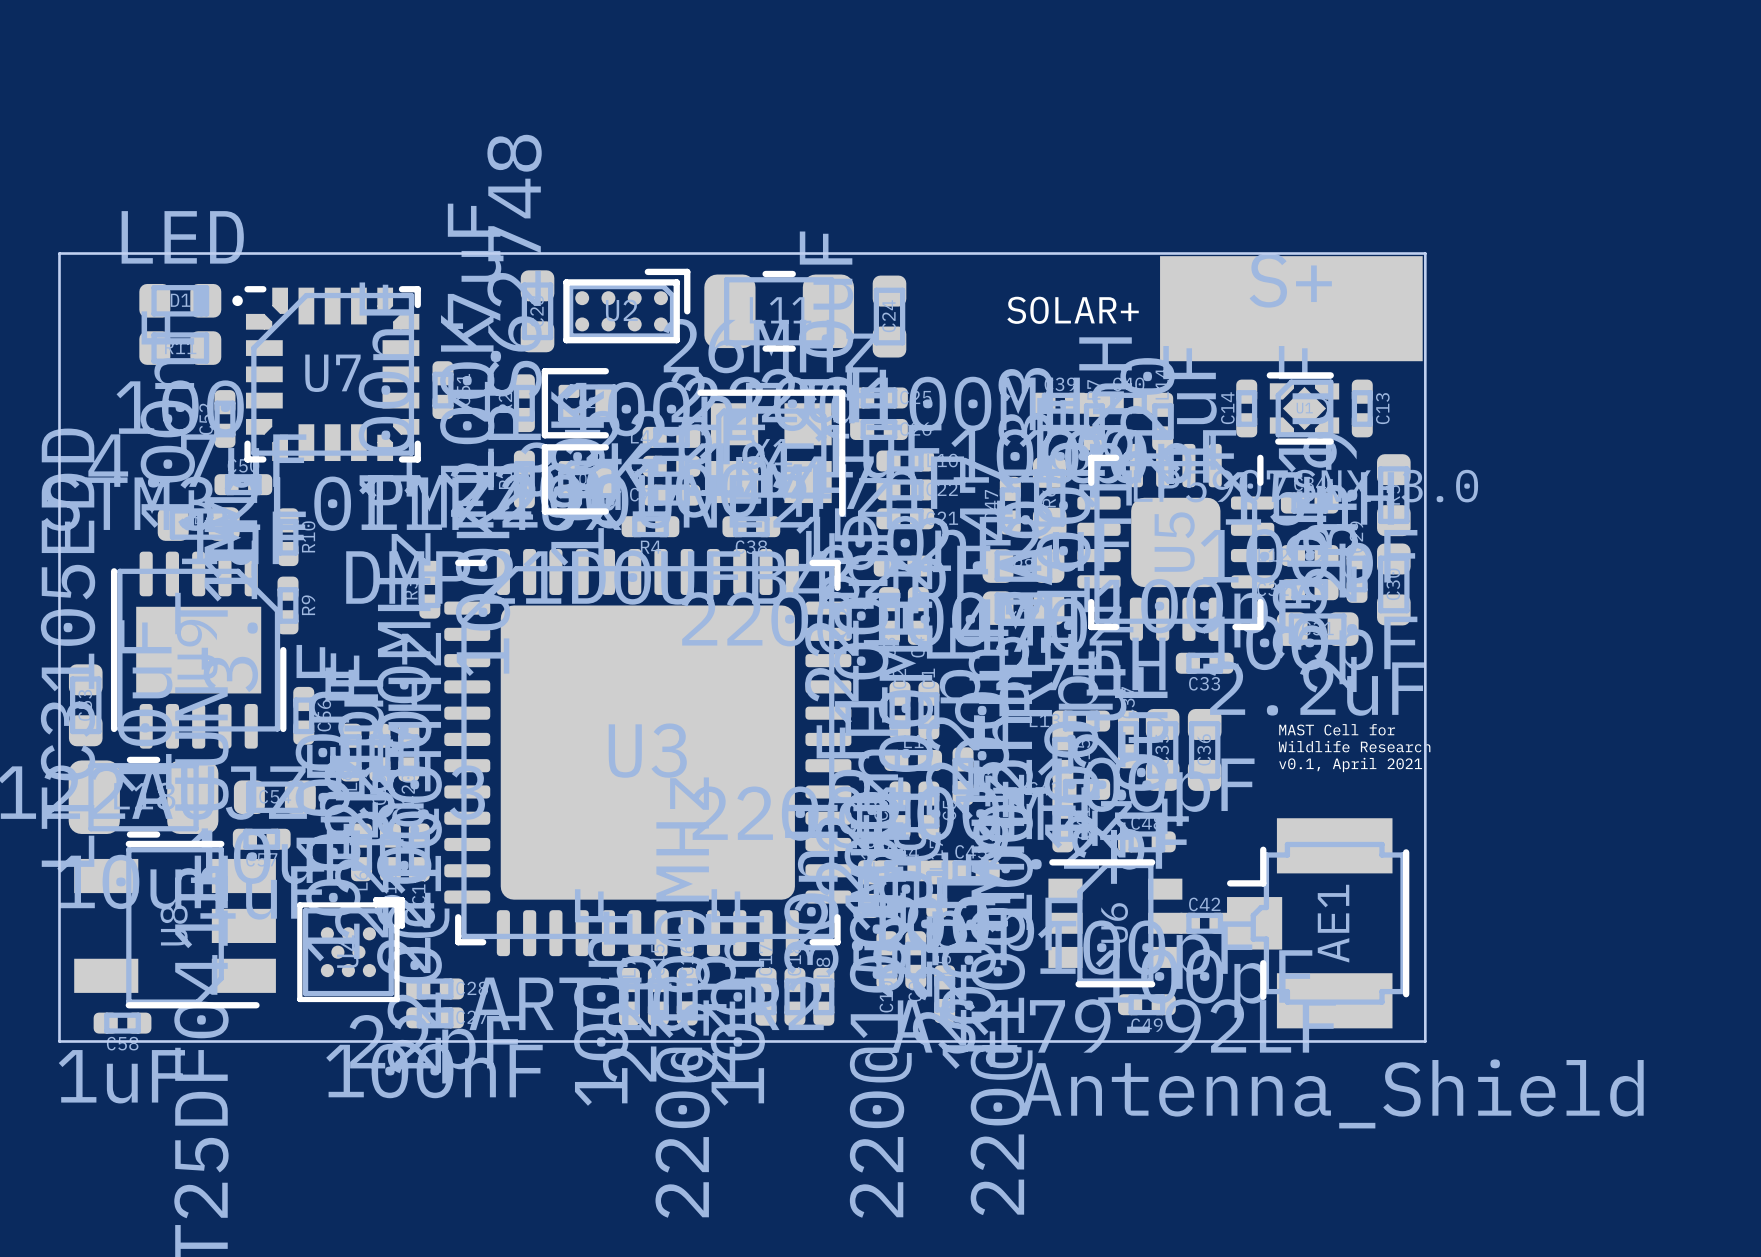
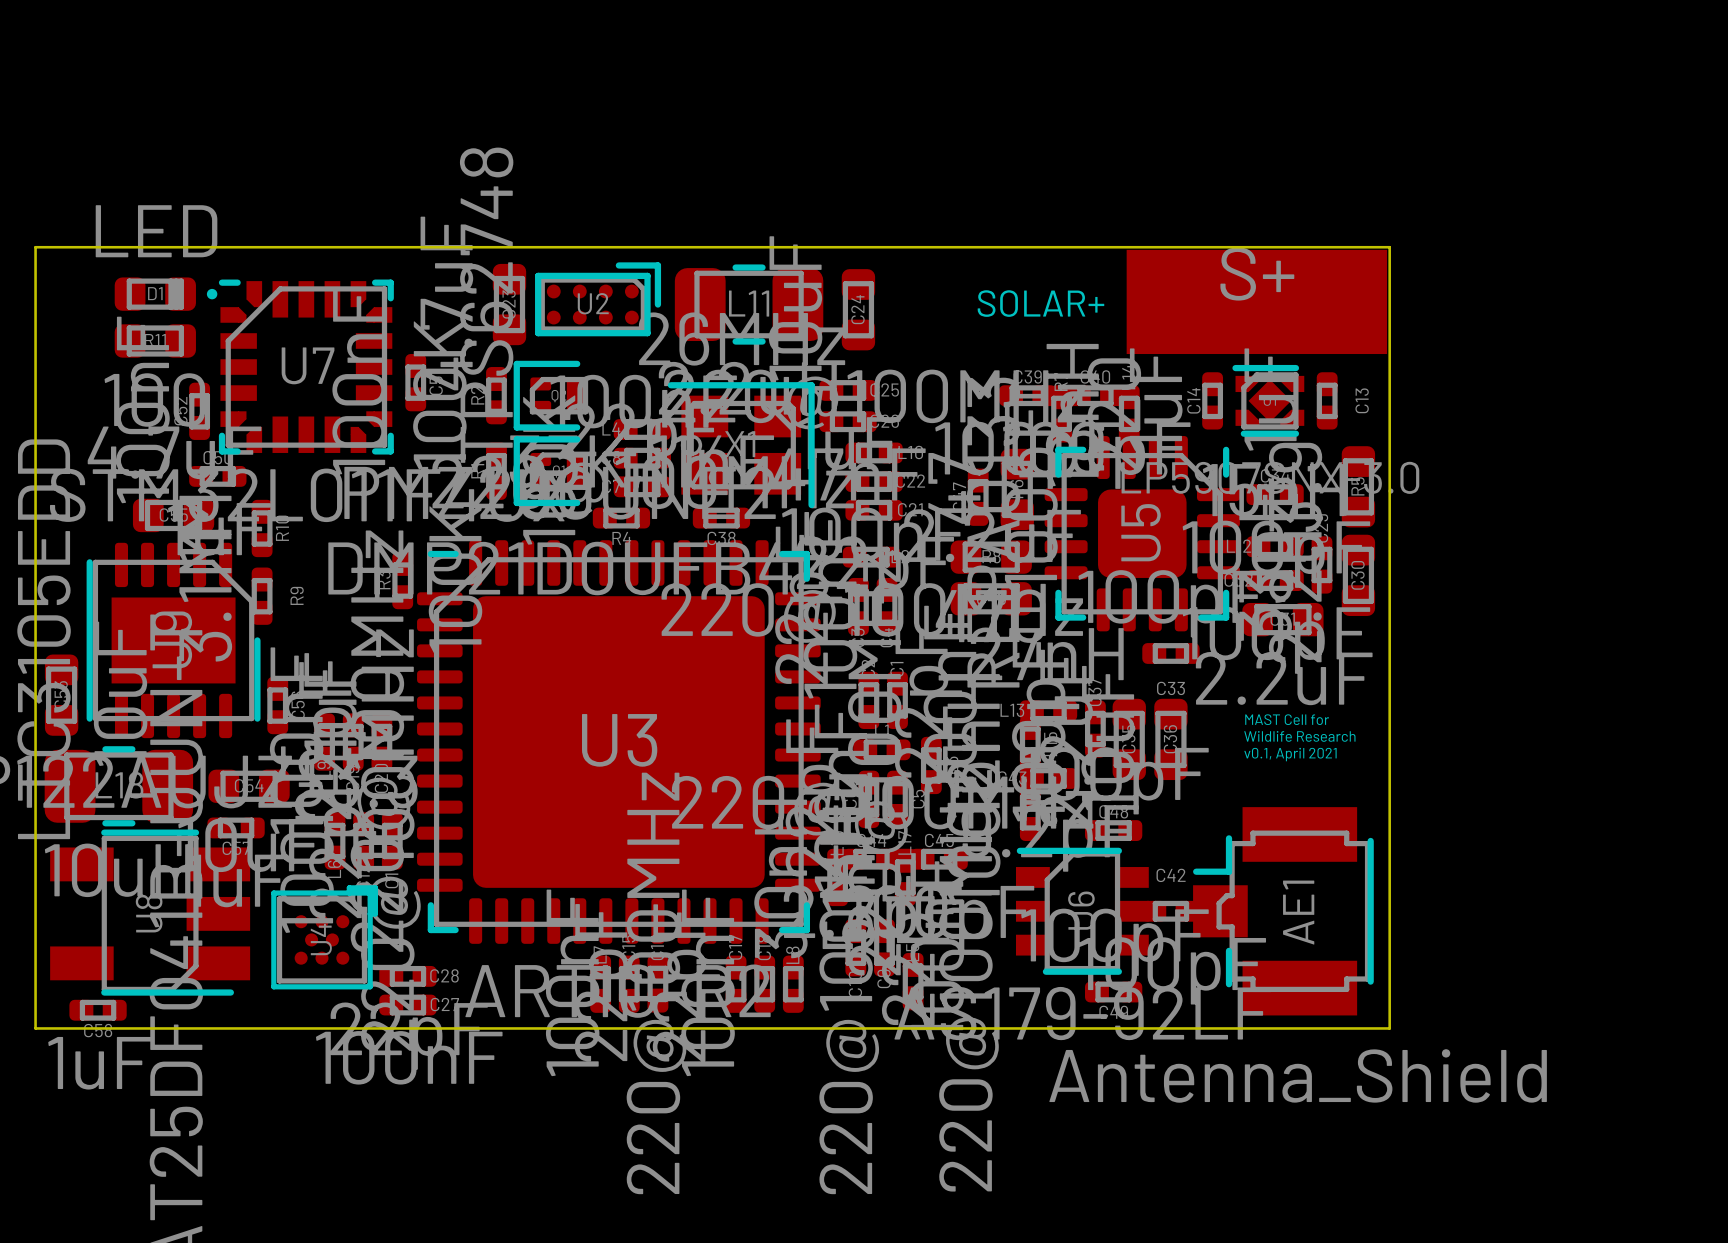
C13 name position: C13 (1382, 408) -> C13 (1362, 400)
R9 name position: R9 (308, 605) -> R9 (297, 595)
C33 name position: C33 (1204, 683) -> C33 (1171, 688)
C42 name position: C42 (1204, 904) -> C42 (1171, 875)

